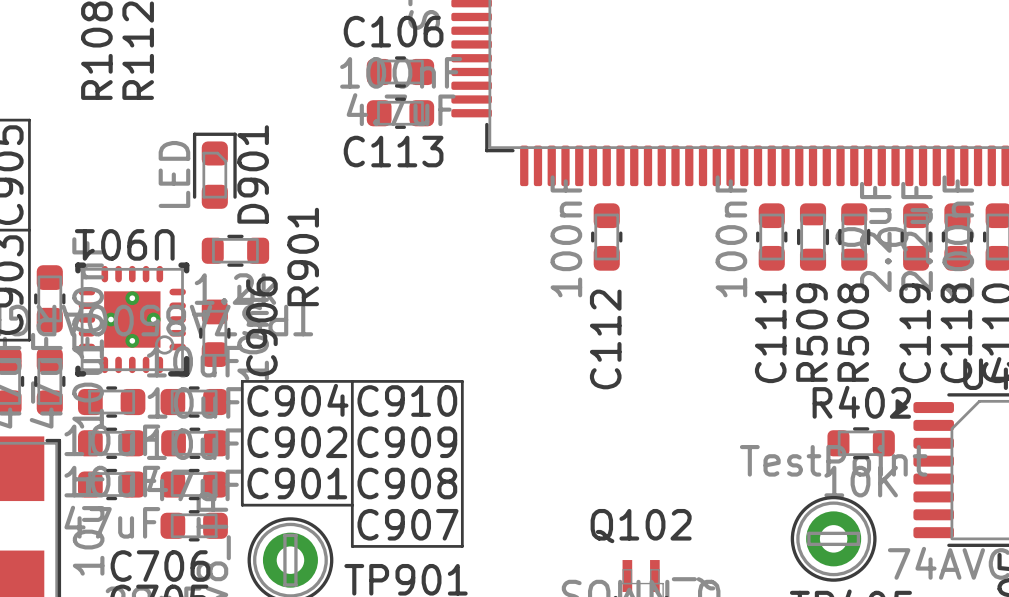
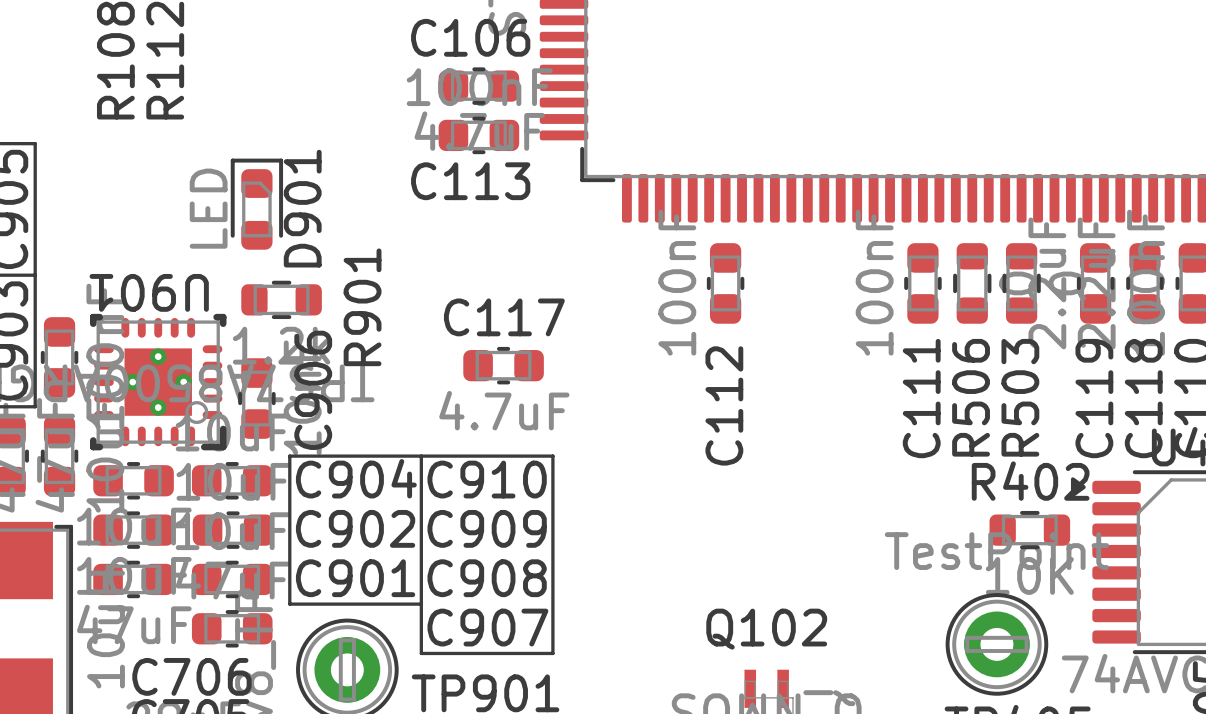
C117: none -> 4.7uF (503, 365)
R509 name: R509 (811, 332) -> R506 (971, 397)
R508 name: R508 (853, 332) -> R503 (1020, 397)

